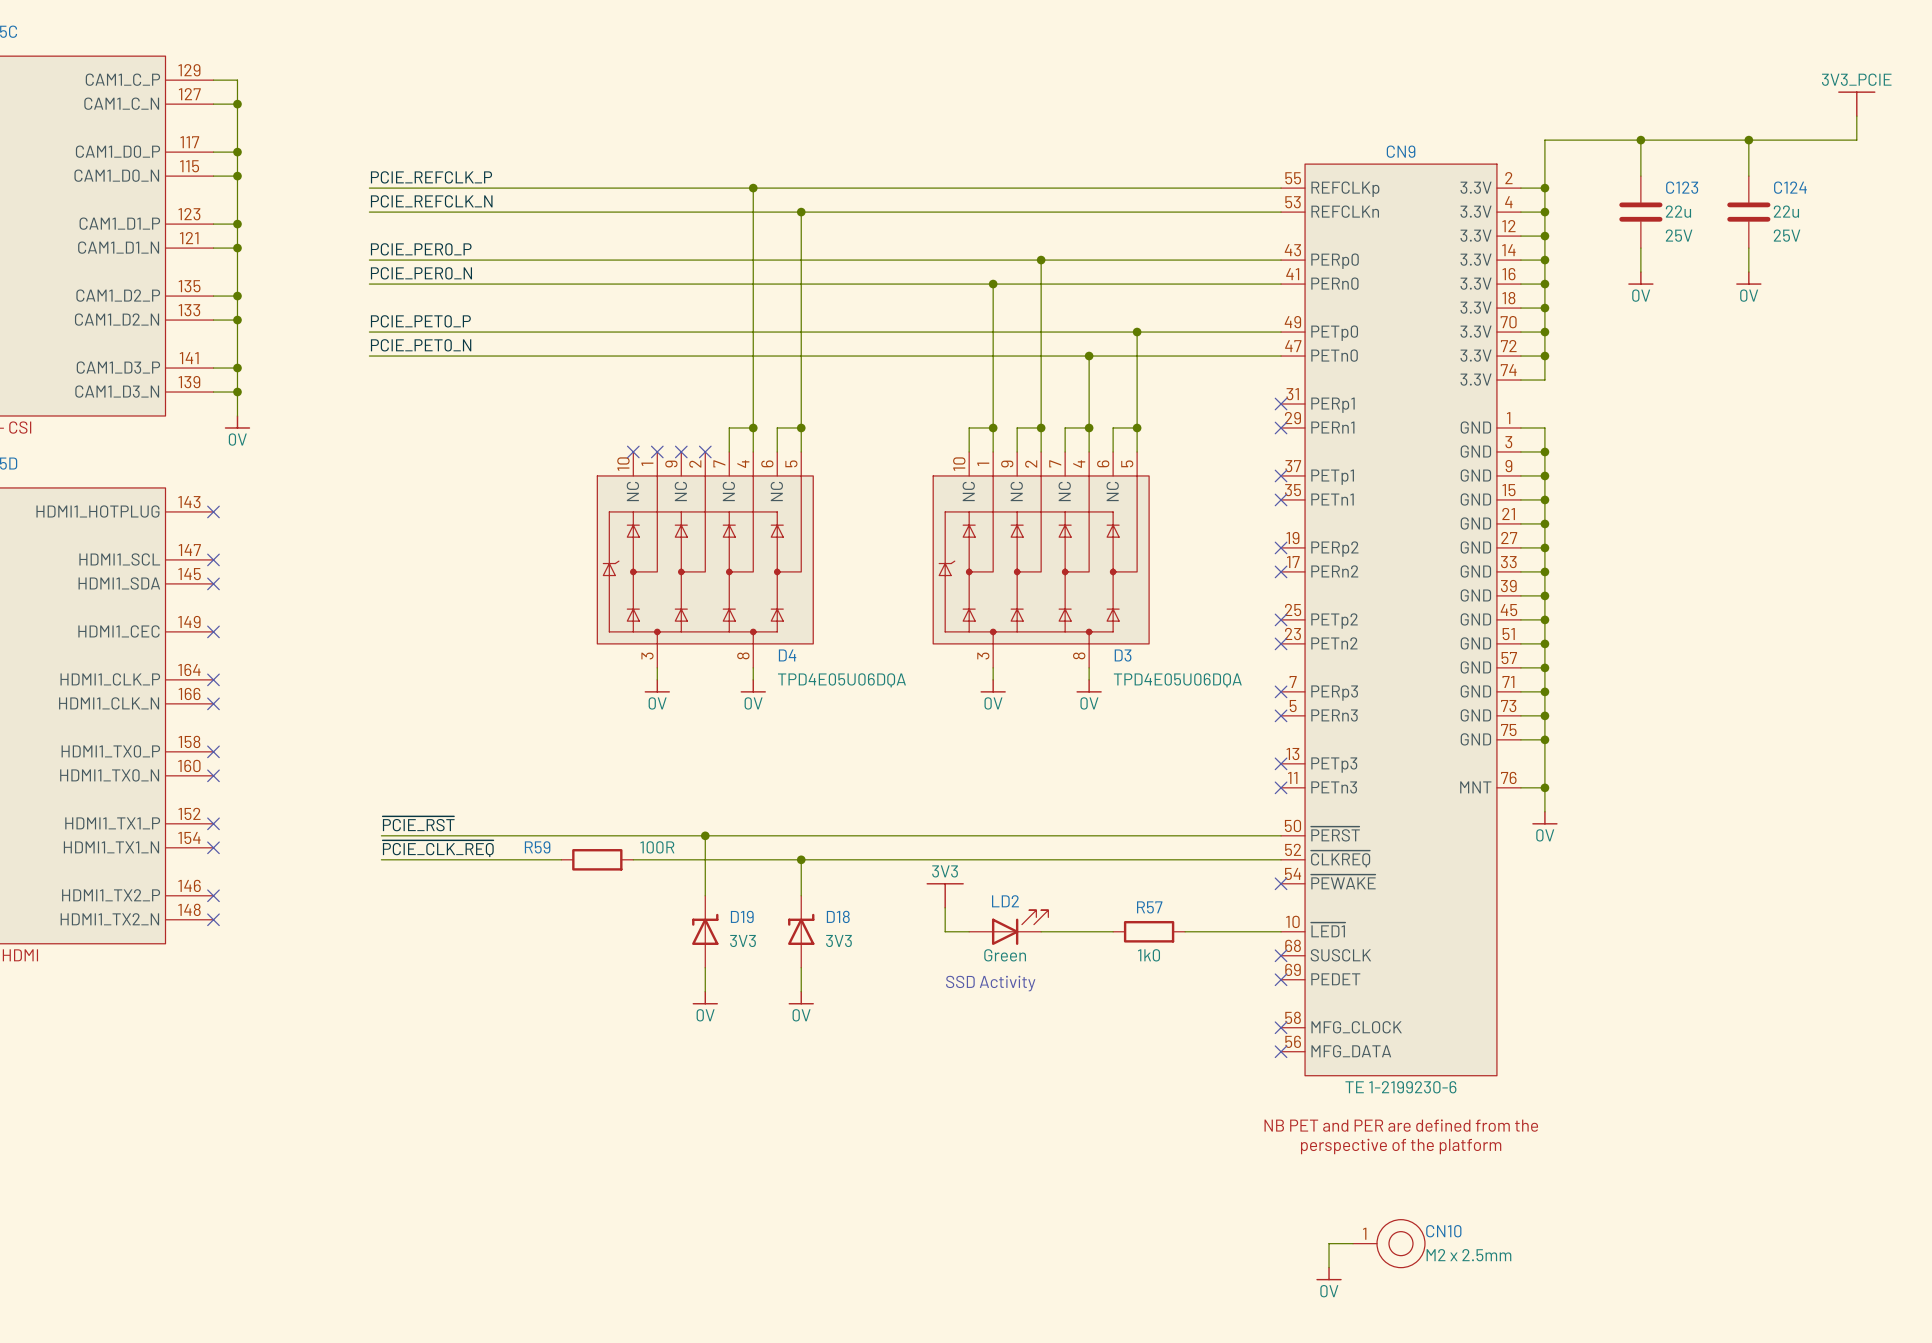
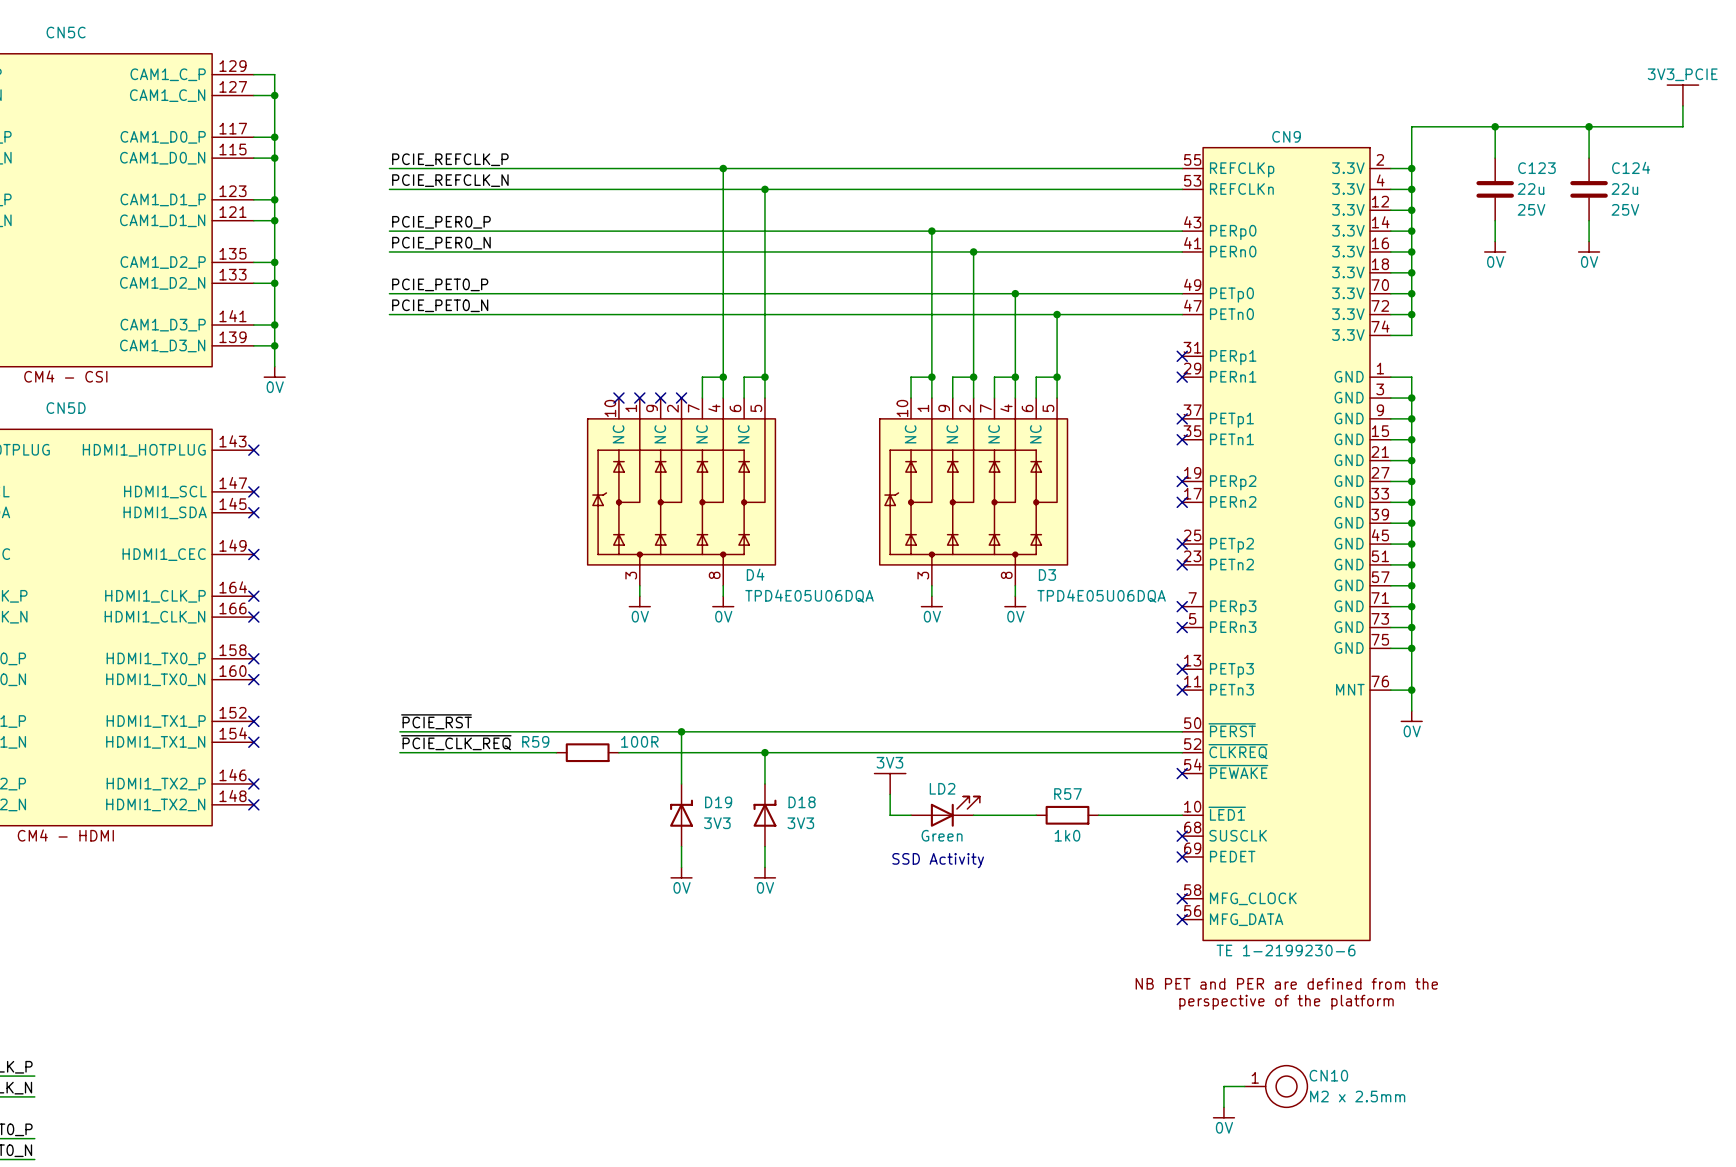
junction: none -> (931, 231)
wire: (1041, 260) (1041, 284) -> (931, 231) (931, 251)
junction: (1041, 260) -> none
junction: (993, 284) -> none
junction: none -> (973, 251)
junction: none -> (1015, 293)
wire: (1137, 332) (1137, 356) -> (1015, 293) (1015, 314)
junction: (1137, 332) -> none
junction: (1089, 356) -> none
junction: none -> (1057, 314)

